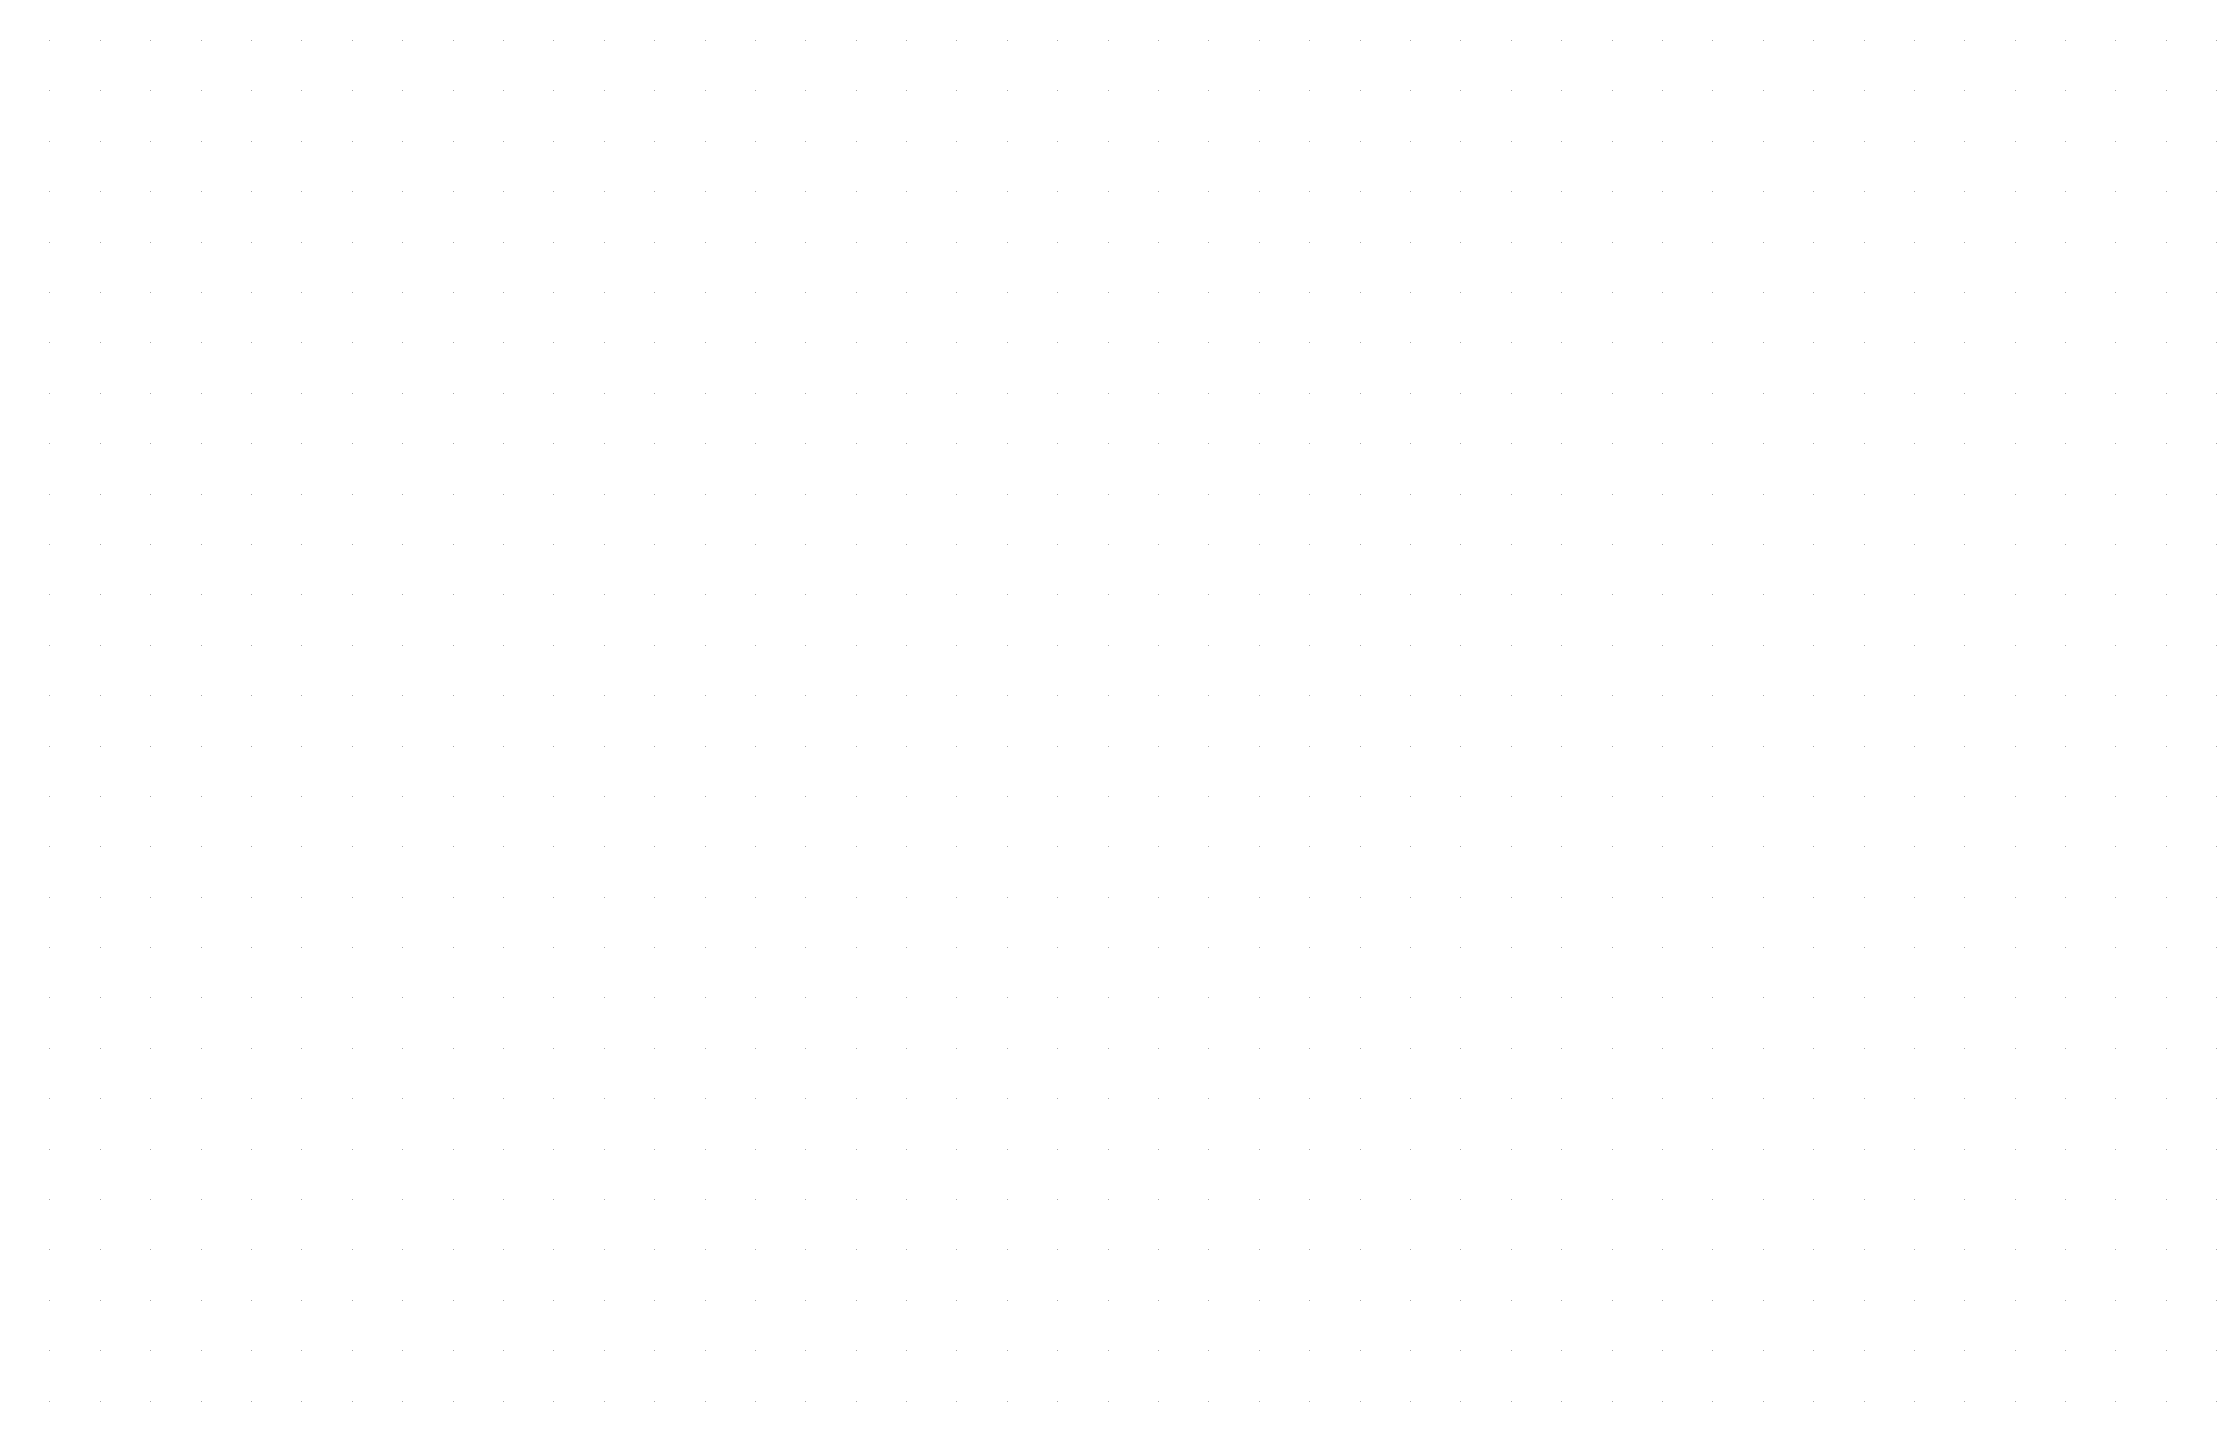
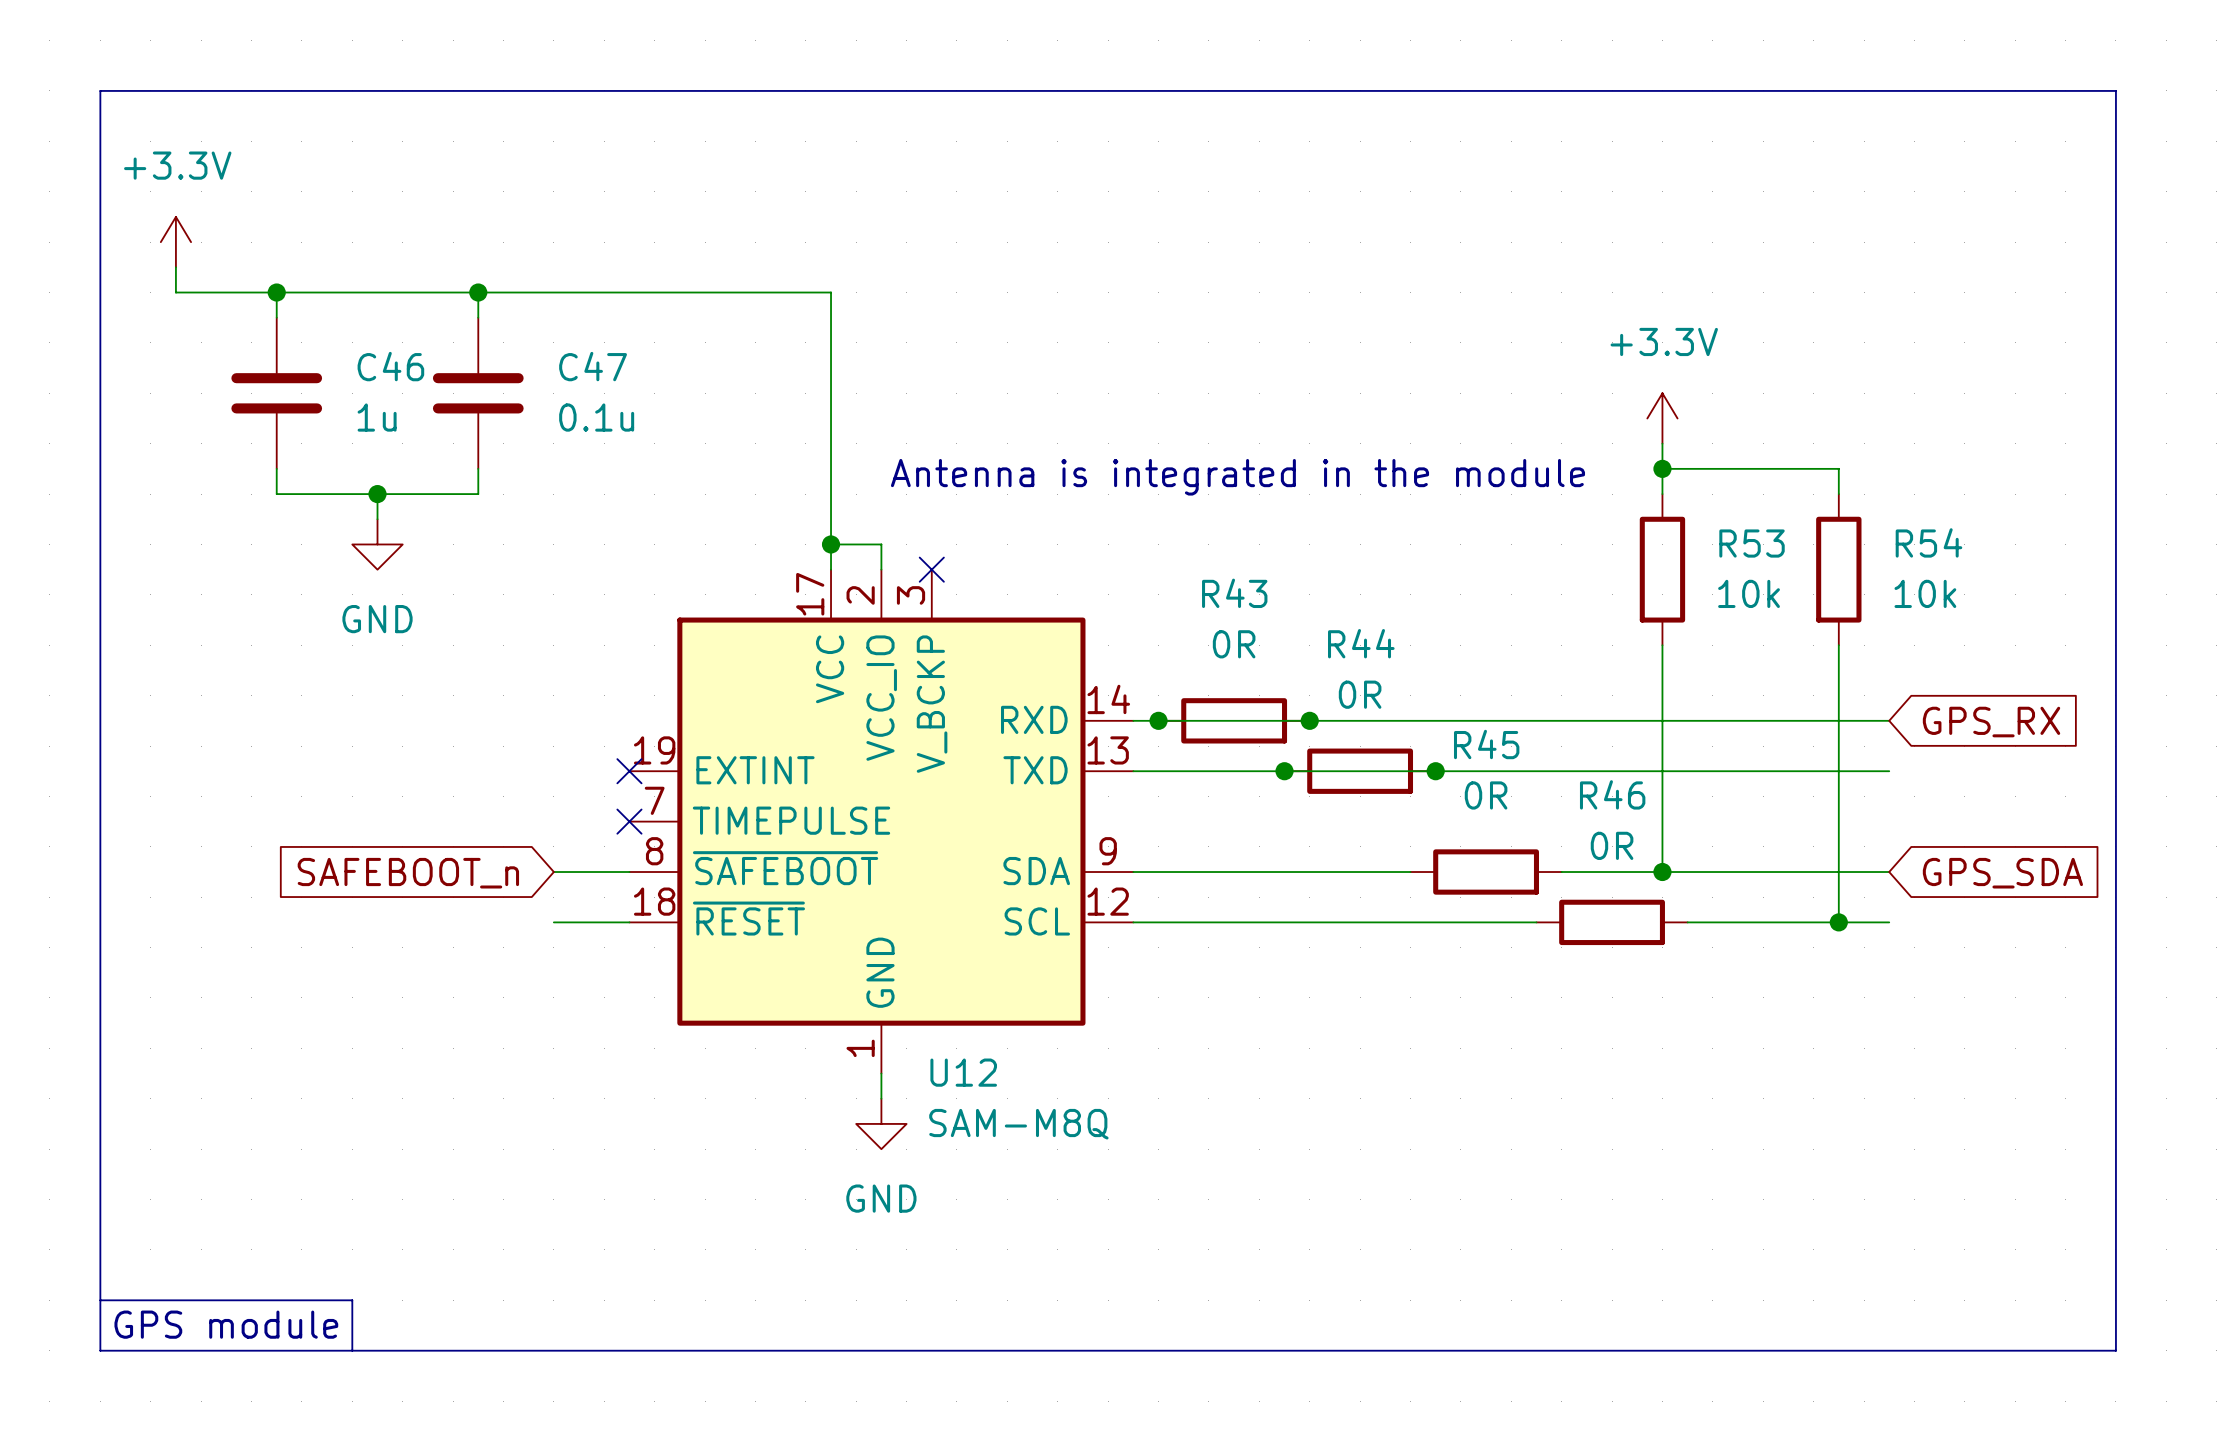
line: none -> (100, 90) (2115, 90) (2115, 1350) (100, 1350) (100, 90)
power symbol: none -> +3.3V (175, 242)
wire: none -> (175, 267) (175, 292) (831, 292) (831, 569)
wire: none -> (276, 292) (276, 317)
junction: none -> (276, 292)
wire: none -> (478, 292) (478, 317)
junction: none -> (478, 292)
C46: none -> 1u (276, 393)
C47: none -> 0.1u (478, 393)
power symbol: none -> +3.3V (1662, 418)
wire: none -> (1662, 443) (1662, 494)
wire: none -> (276, 468) (276, 494) (478, 494) (478, 468)
wire: none -> (1662, 468) (1838, 468) (1838, 494)
junction: none -> (1662, 468)
text: none -> Antenna is integrated in the module (1237, 477)
wire: none -> (377, 494) (377, 519)
junction: none -> (377, 494)
power symbol: none -> GND (377, 544)
wire: none -> (831, 544) (881, 544) (881, 569)
junction: none -> (831, 544)
no-connect mark: none -> (931, 569)
R53: none -> 10k (1662, 569)
R54: none -> 10k (1838, 569)
wire: none -> (1662, 645) (1662, 872)
wire: none -> (1838, 645) (1838, 922)
wire: none -> (1133, 720) (1889, 720)
junction: none -> (1158, 720)
R43: none -> 0R (1234, 720)
junction: none -> (1309, 720)
global label: none -> GPS_RX (1991, 722)
no-connect mark: none -> (629, 771)
wire: none -> (1133, 771) (1889, 771)
junction: none -> (1284, 771)
R44: none -> 0R (1360, 771)
junction: none -> (1435, 771)
no-connect mark: none -> (629, 821)
U12: none -> SAM-M8Q (881, 821)
wire: none -> (553, 872) (629, 872)
wire: none -> (1133, 872) (1410, 872)
R45: none -> 0R (1486, 872)
wire: none -> (1561, 872) (1889, 872)
junction: none -> (1662, 872)
global label: none -> SAFEBOOT_n (408, 873)
global label: none -> GPS_SDA (2002, 873)
wire: none -> (553, 922) (629, 922)
wire: none -> (1133, 922) (1536, 922)
R46: none -> 0R (1612, 922)
wire: none -> (1687, 922) (1889, 922)
junction: none -> (1838, 922)
wire: none -> (881, 1073) (881, 1098)
power symbol: none -> GND (881, 1123)
line: none -> (100, 1300) (352, 1300) (352, 1350)
text: none -> GPS module (226, 1324)

